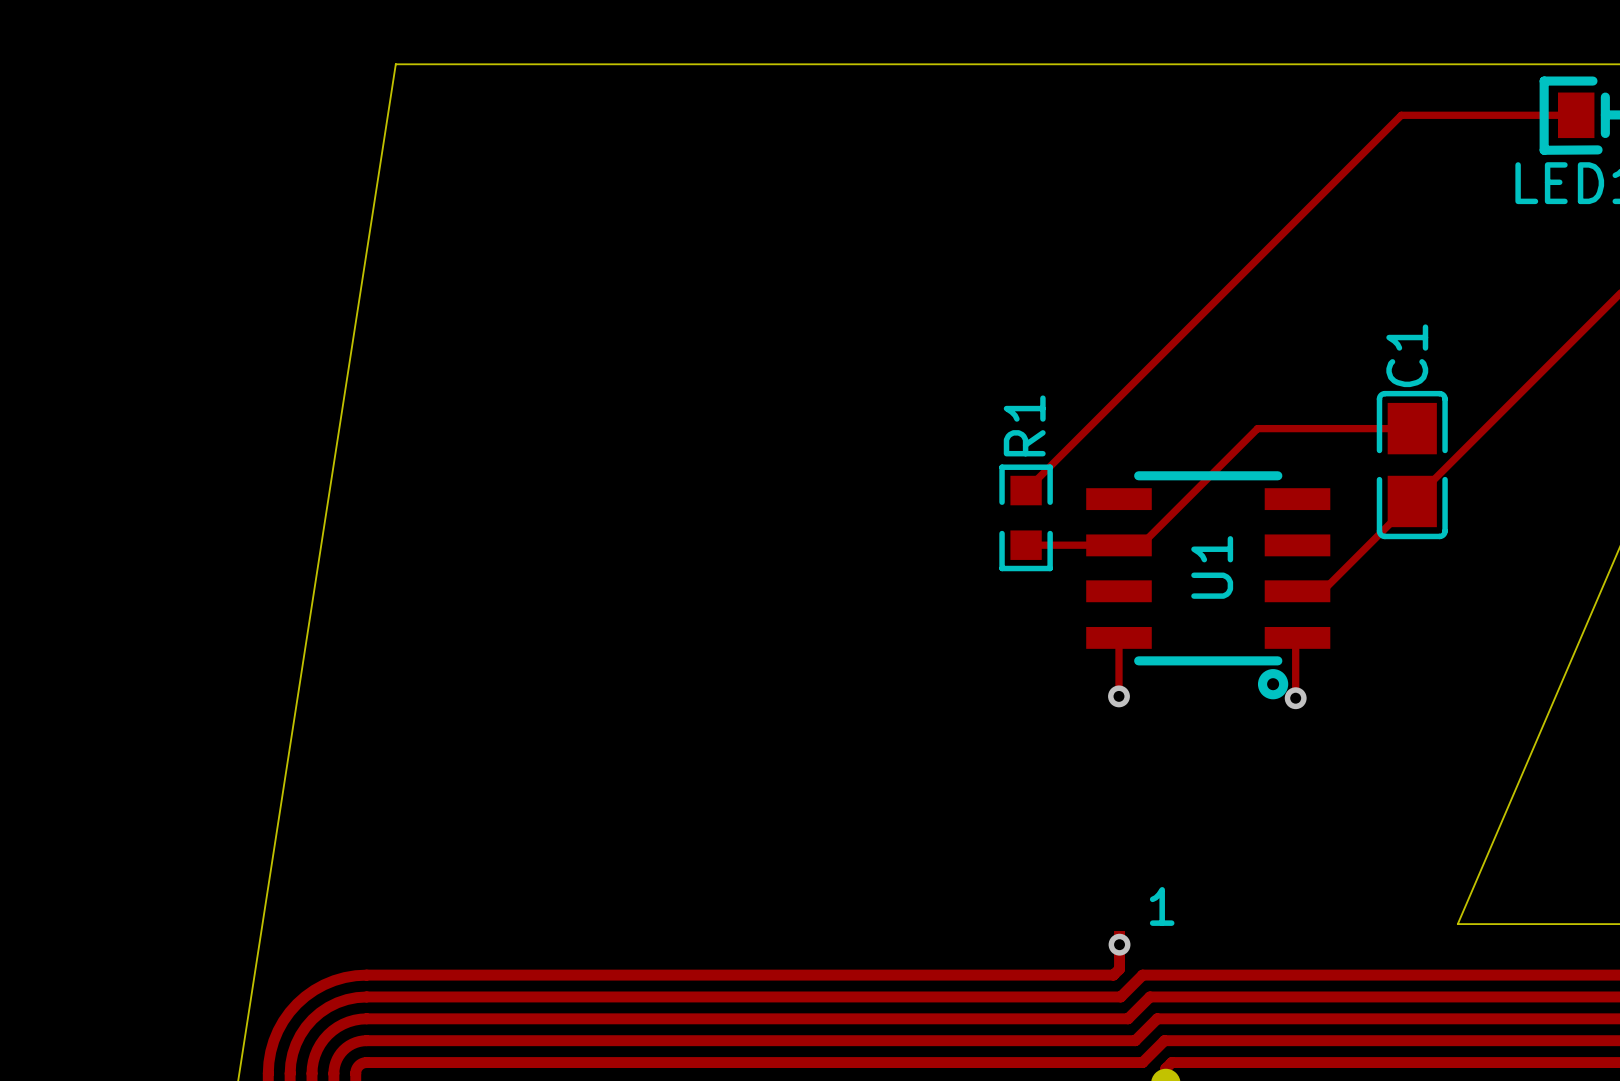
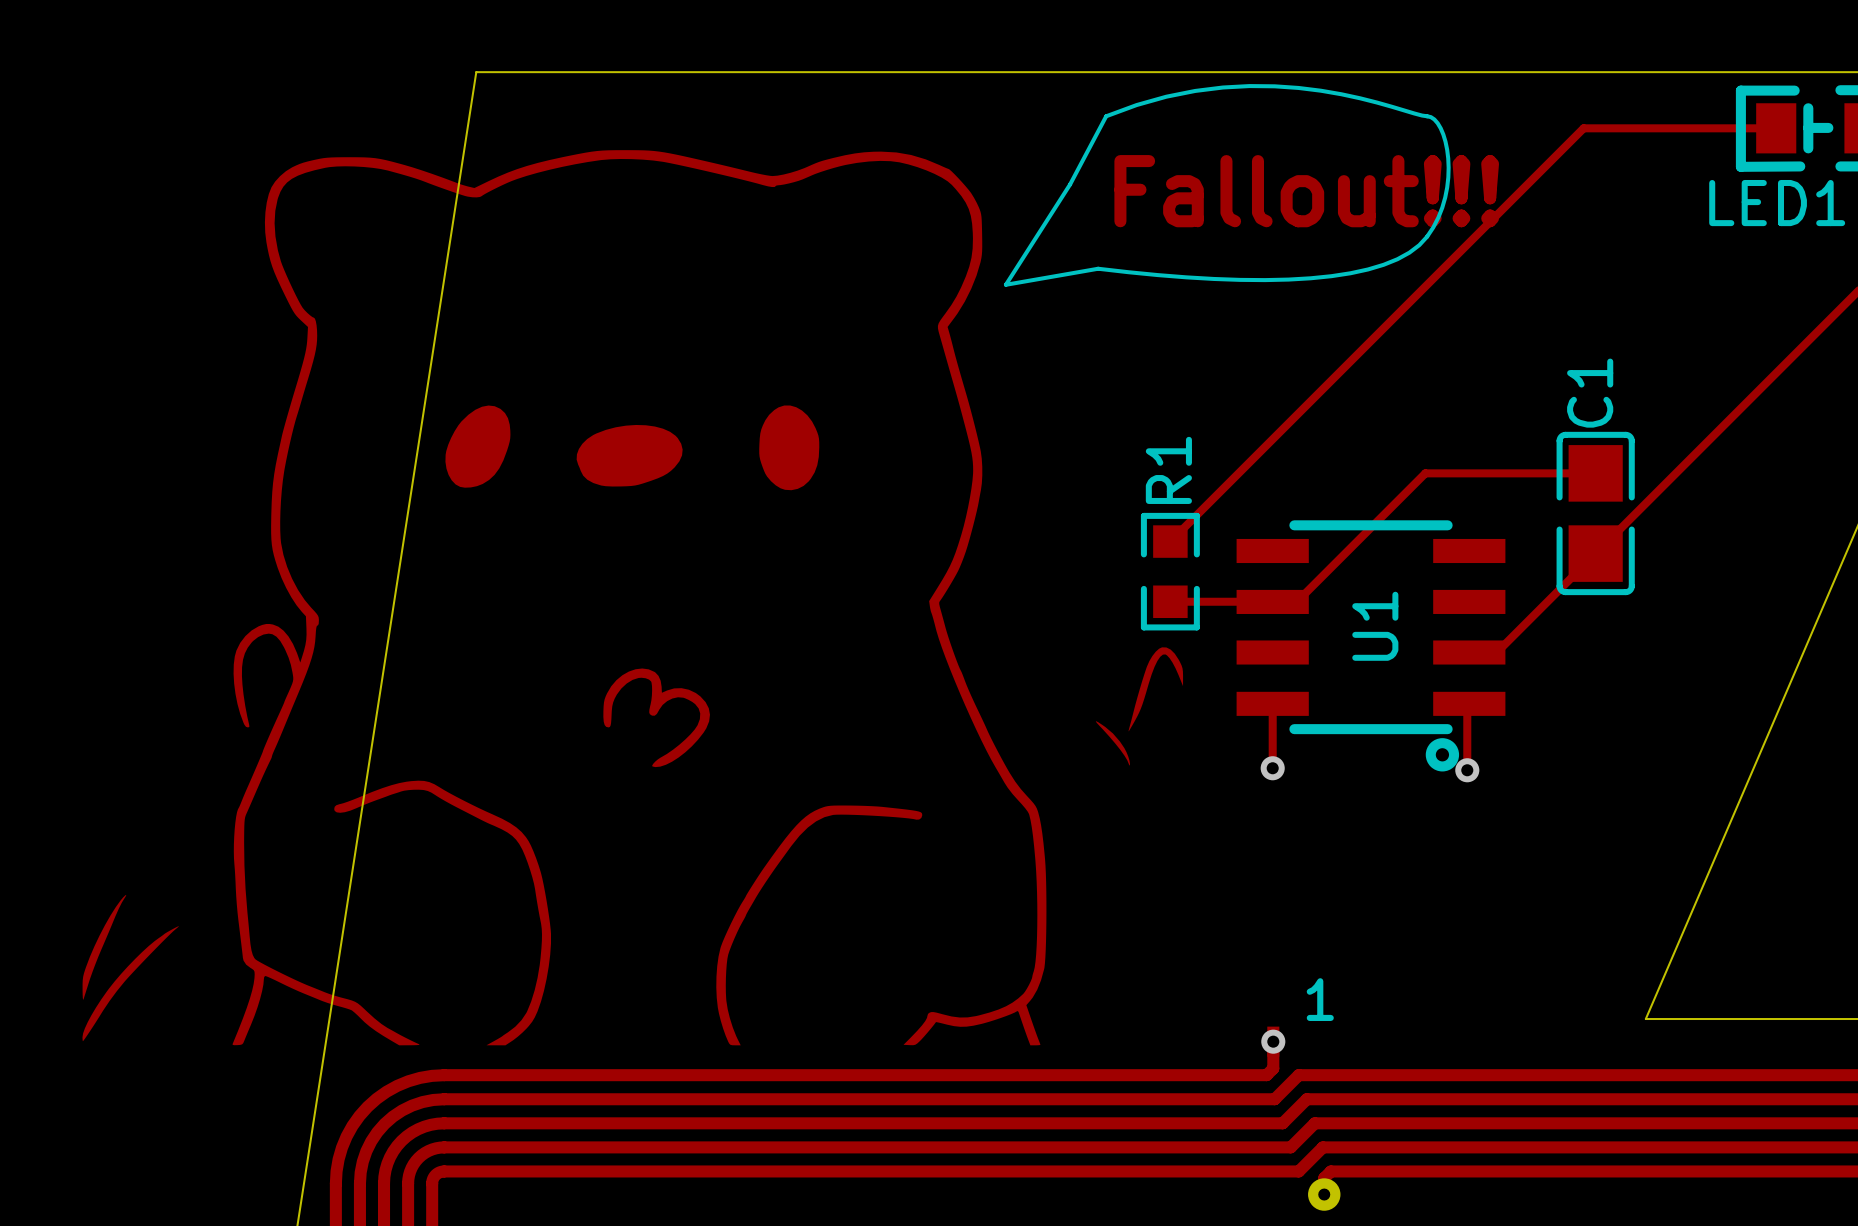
line: none -> (1106, 116) (1070, 184) (1005, 284) (1098, 268) (1186, 277) (1240, 279) (1310, 278) (1350, 273) (1397, 259) (1419, 245) (1433, 227) (1445, 197) (1448, 177) (1448, 158) (1445, 141) (1437, 123) (1430, 117) (1360, 98) (1298, 87) (1249, 86) (1222, 87) (1166, 96) (1106, 116)
drawing: none -> [82, 150, 1184, 1046]
text: none -> Fallout!!! (1306, 191)

